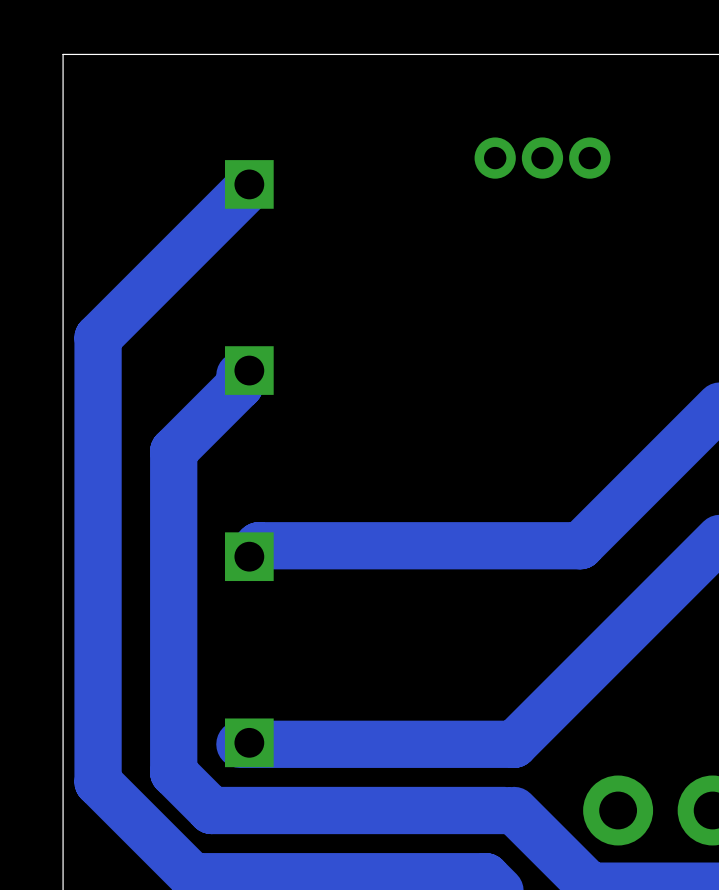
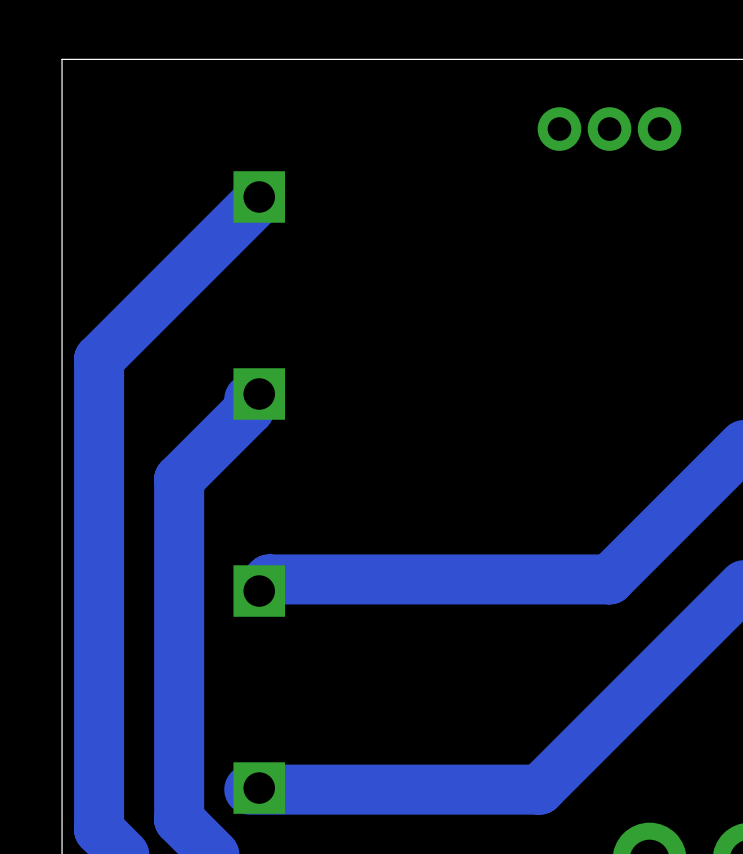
part position: (542, 158) -> (609, 129)

